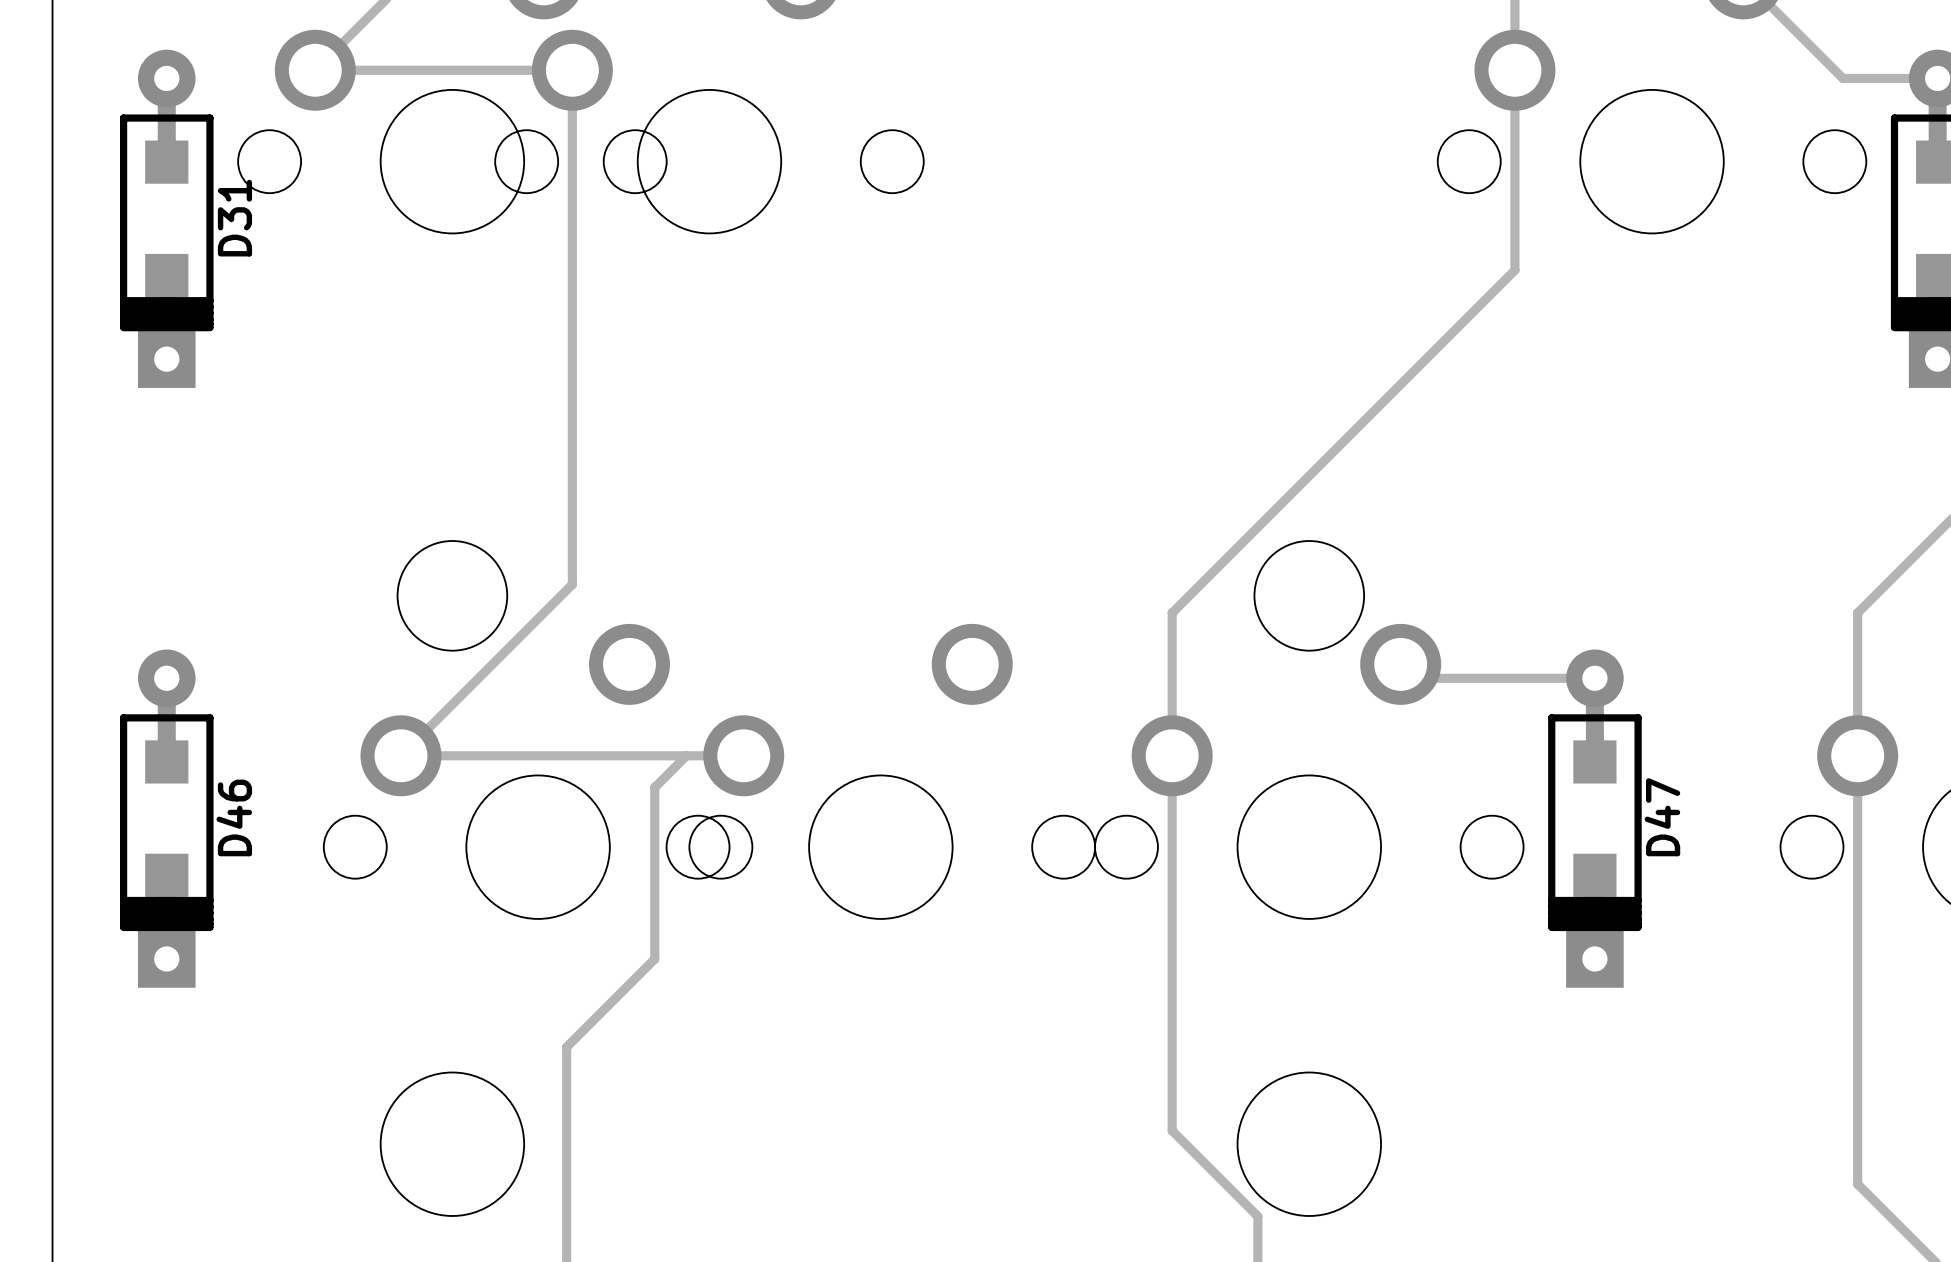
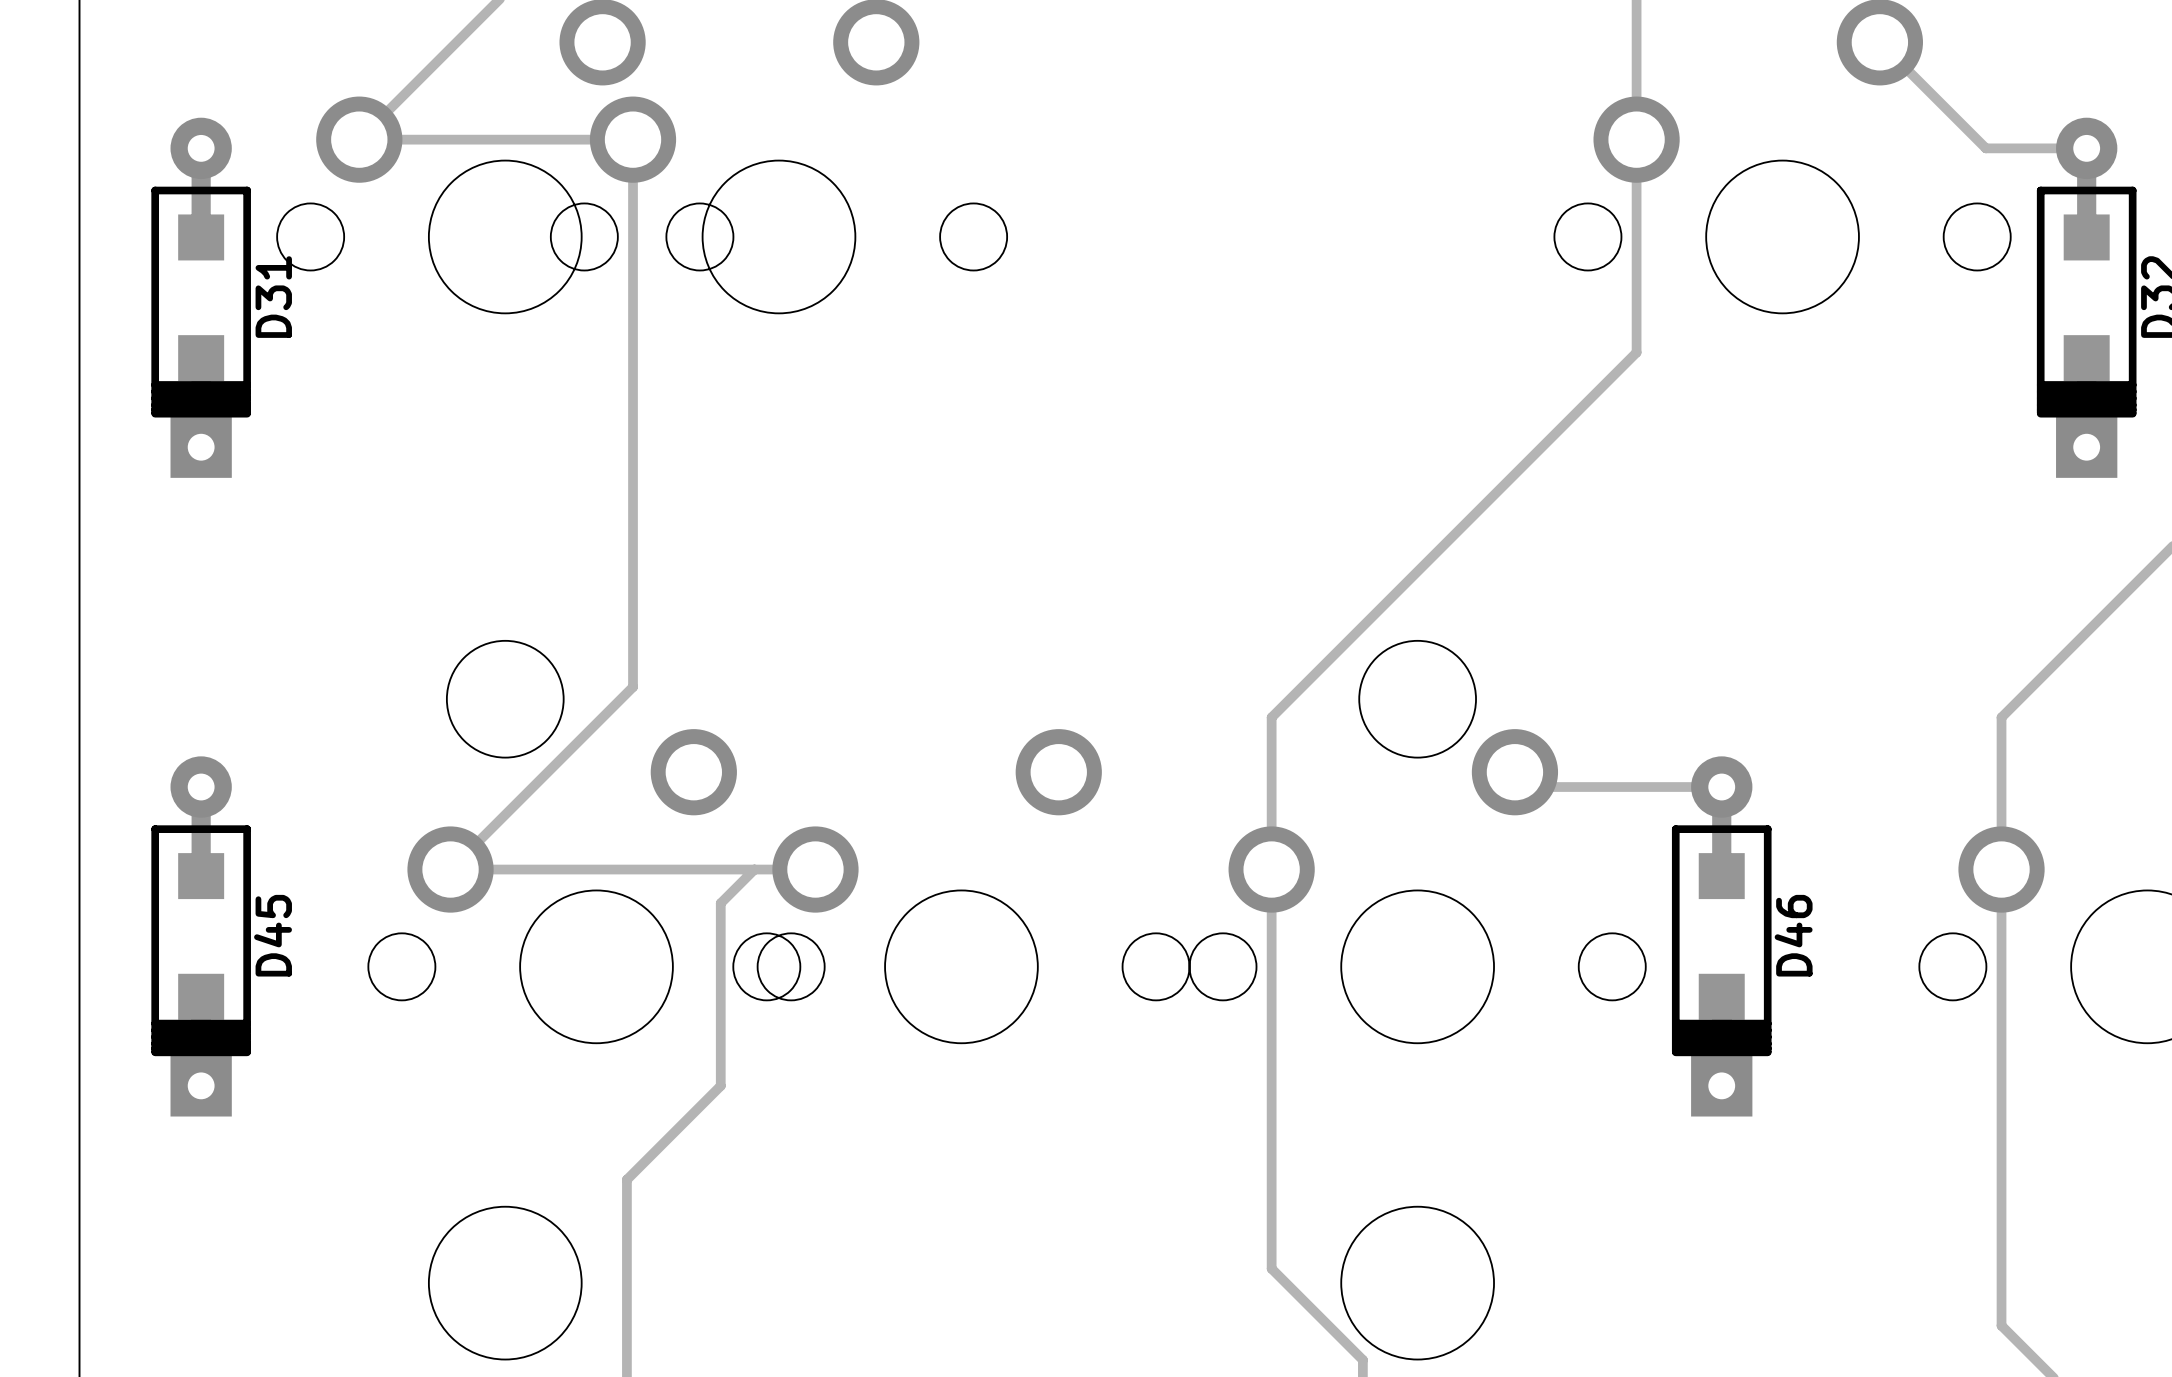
D46 name: D46 (234, 817) -> D45 (273, 935)
D47 name: D47 (1662, 817) -> D46 (1793, 935)

